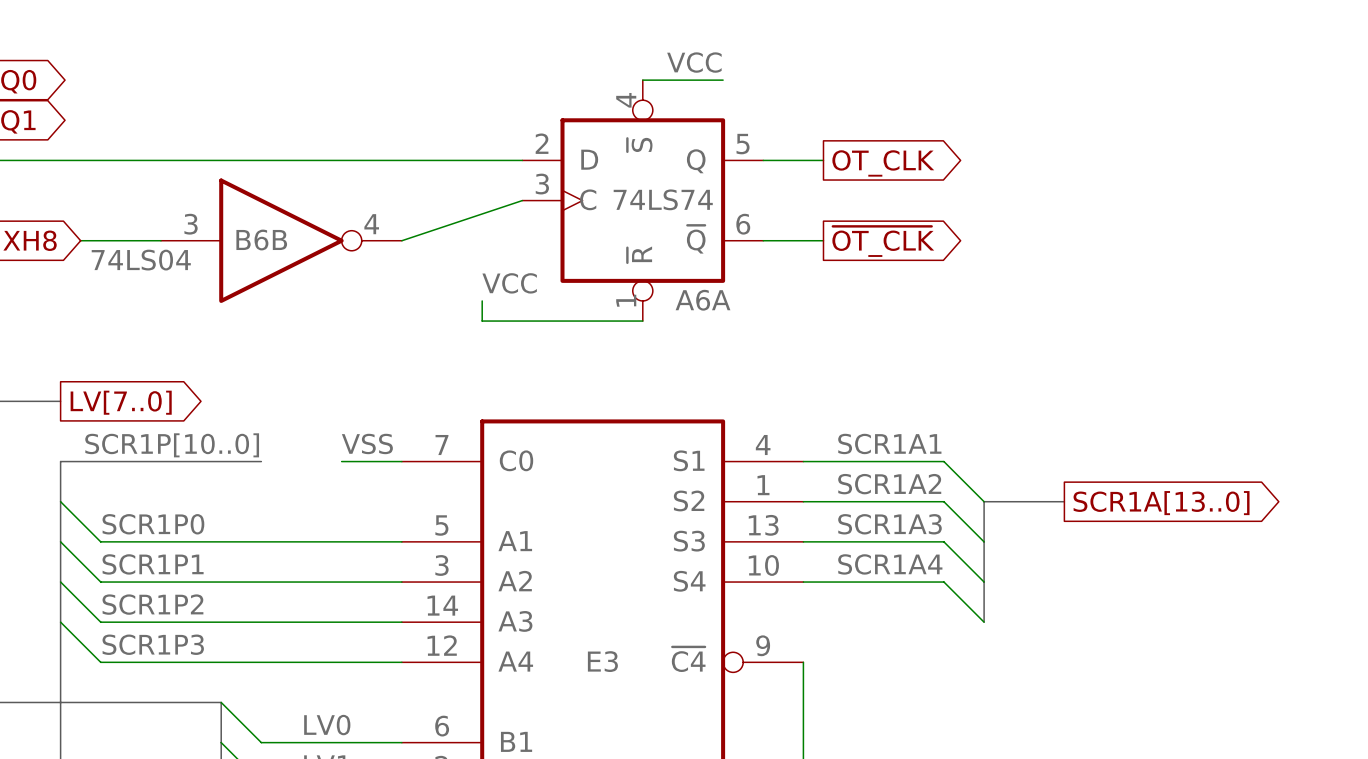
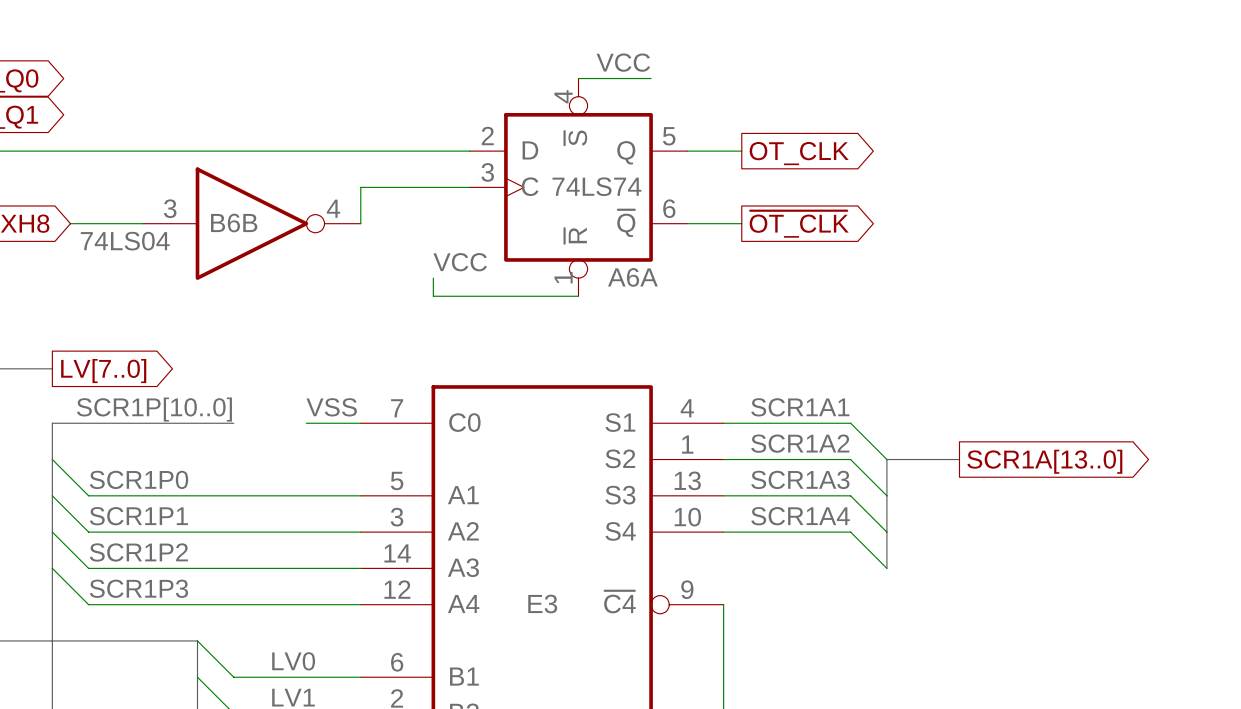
wire: (522, 200) (401, 240) -> (469, 187) (360, 187) (360, 223)

